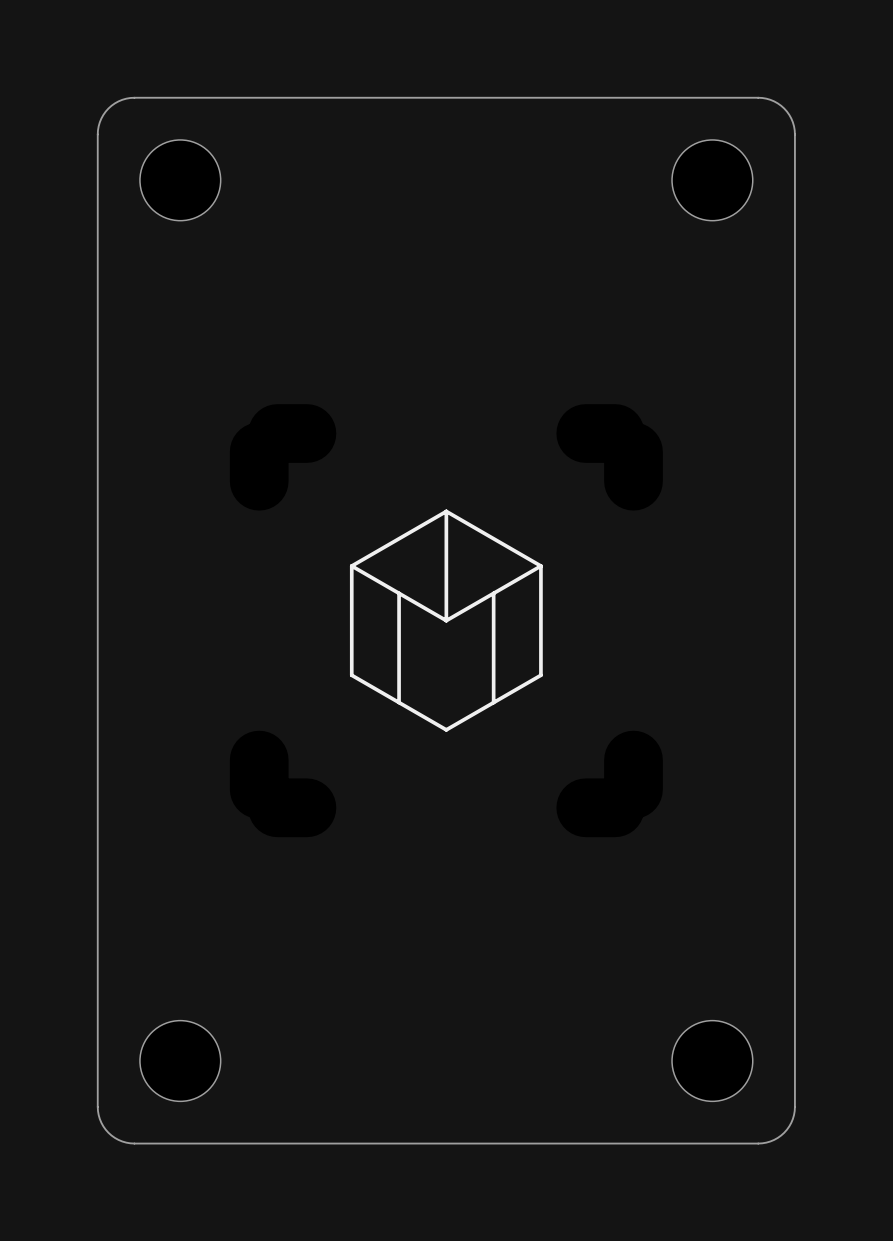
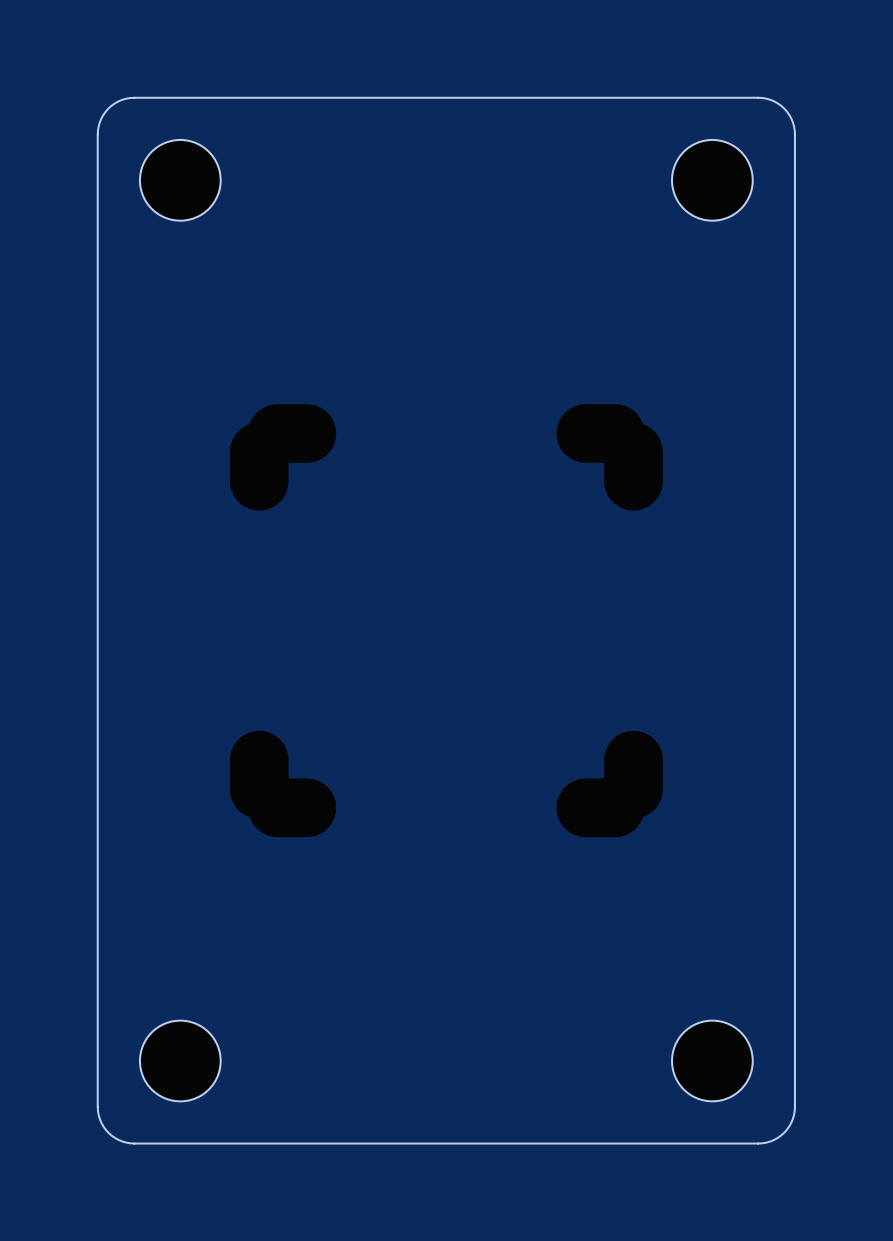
drawing: [349, 509, 543, 732] -> none

